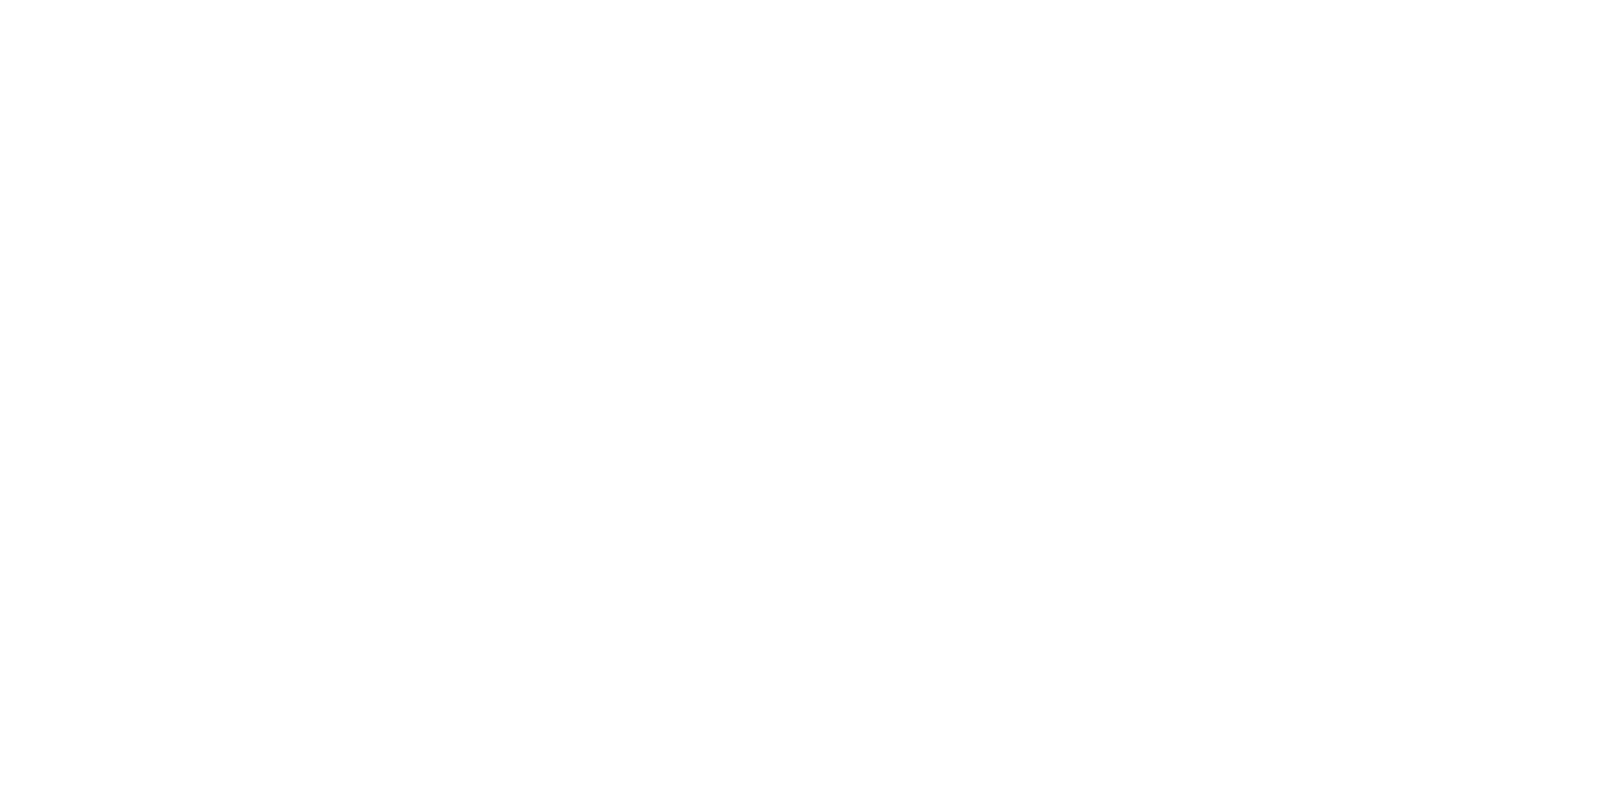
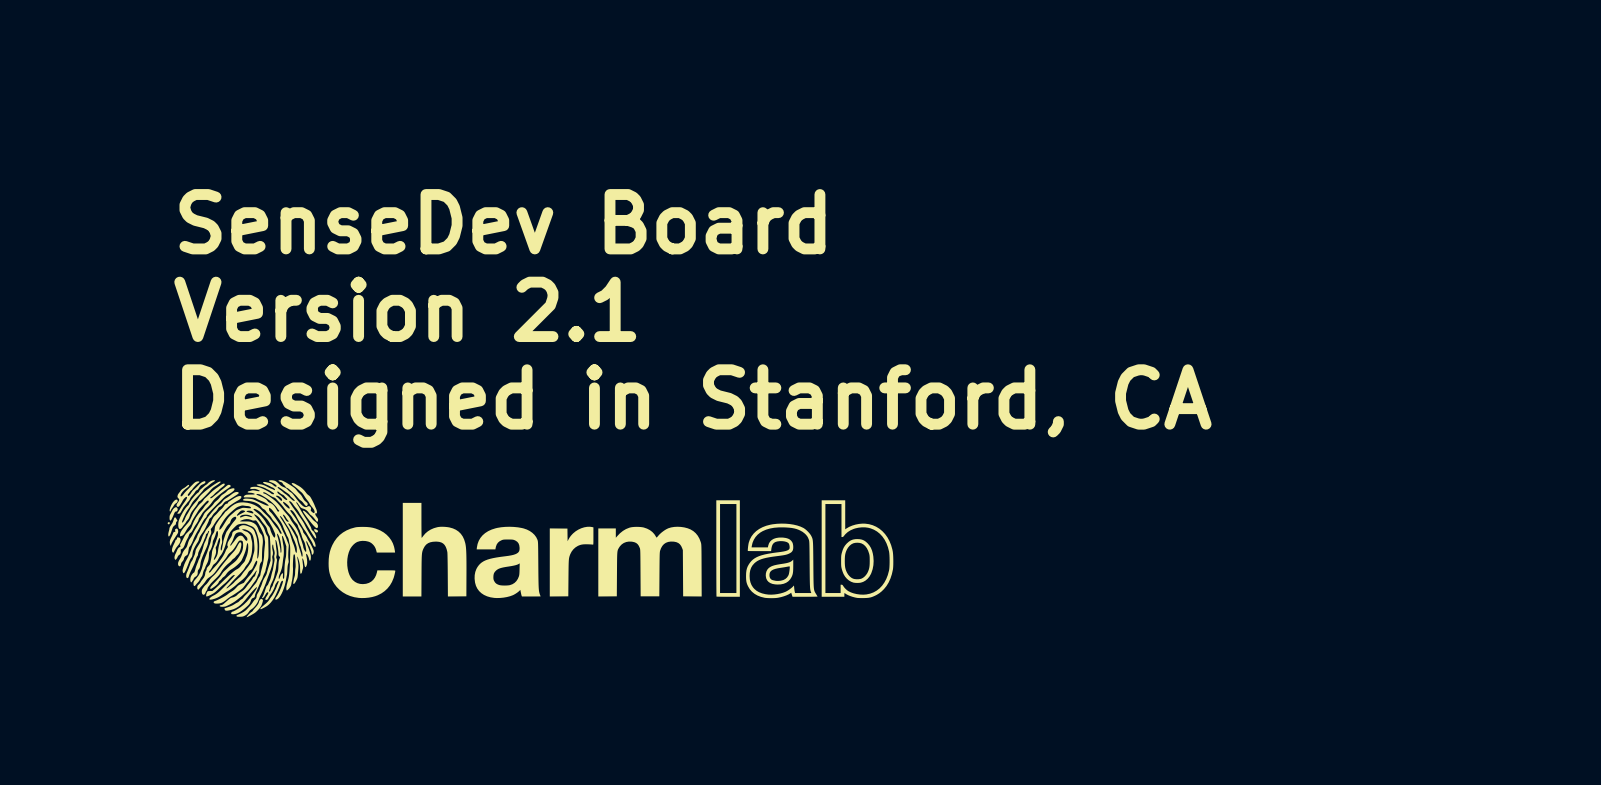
text: none -> SenseDev Board (502, 221)
text: none -> Version 2.1 (405, 309)
text: none -> Designed in Stanford, CA (696, 406)
drawing: none -> [167, 480, 894, 618]

